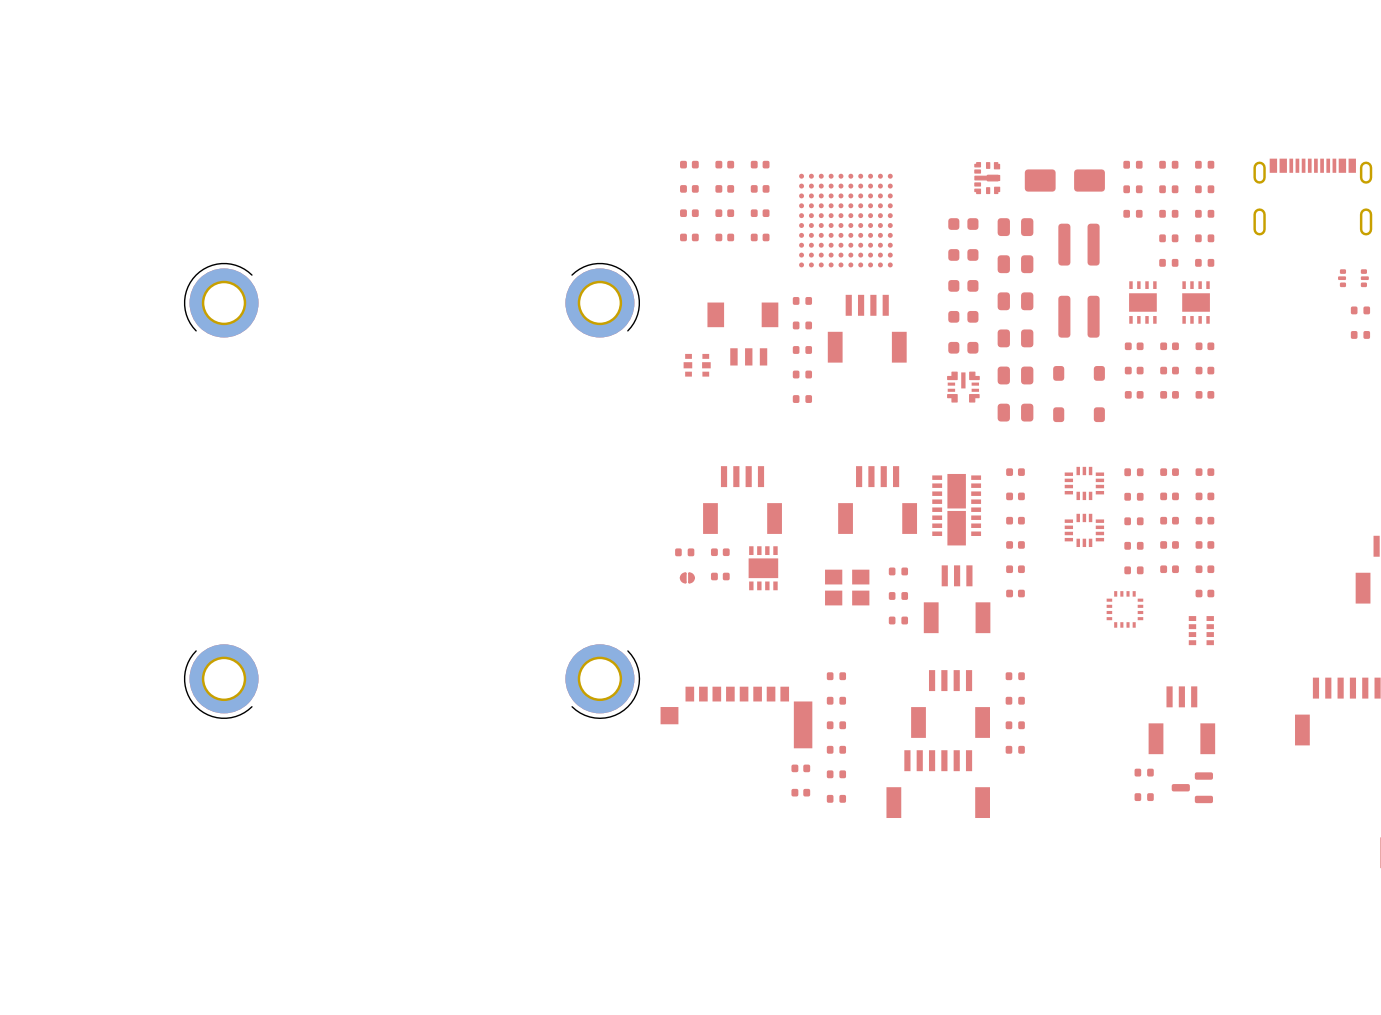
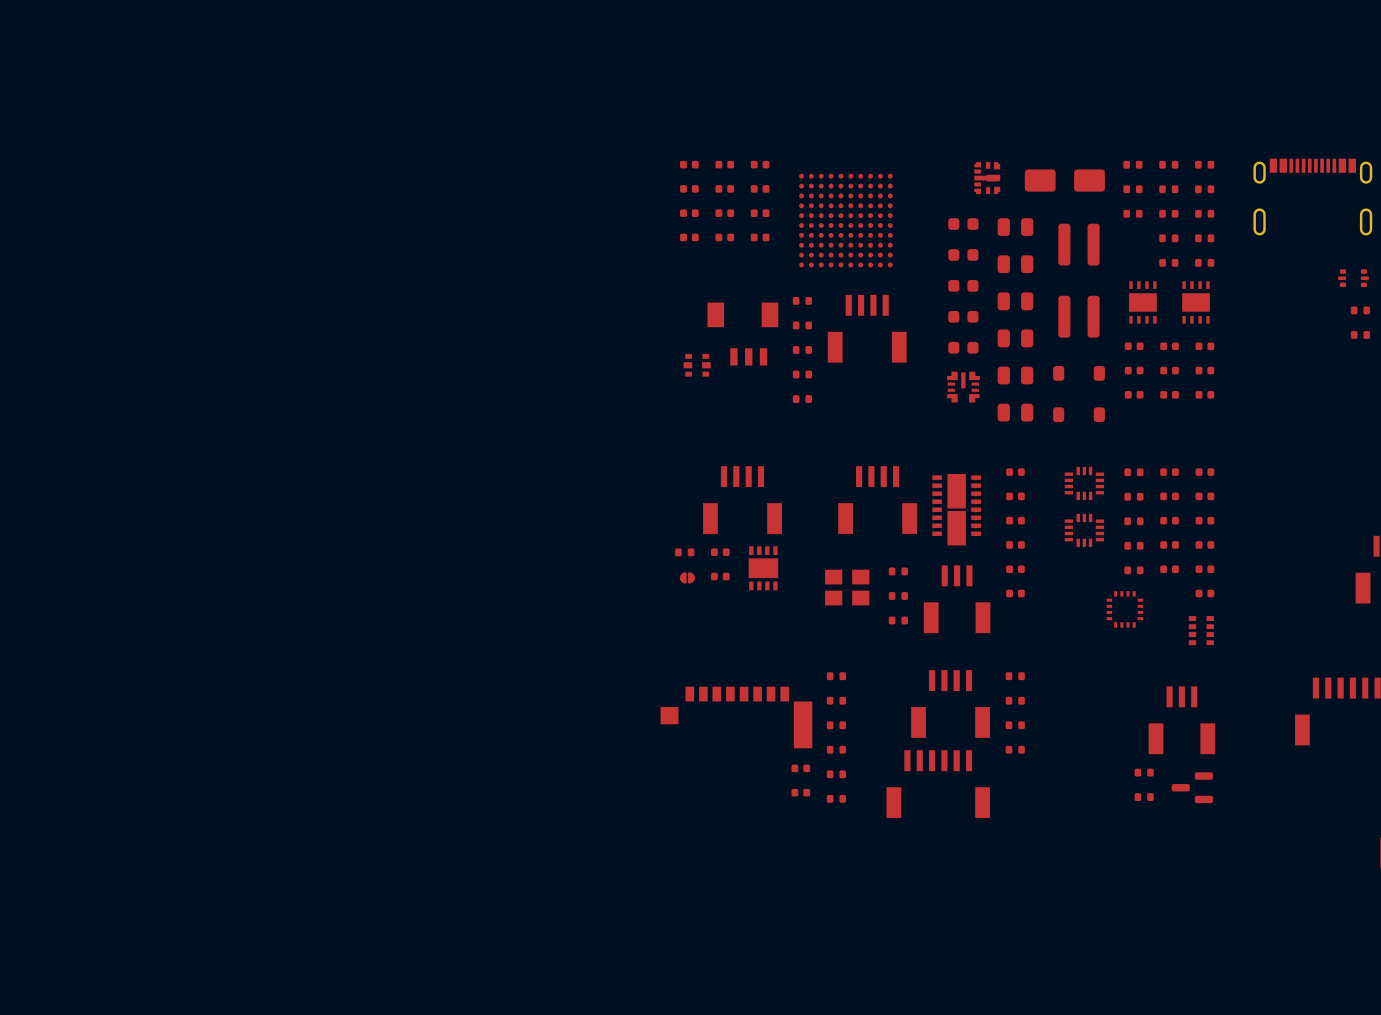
board edge: (251, 275) (240, 266) (226, 263) (207, 266) (196, 275) (188, 286) (184, 305) (188, 319) (196, 330) -> none
board edge: (572, 275) (588, 265) (602, 263) (616, 266) (627, 275) (635, 286) (639, 300) (637, 314) (627, 330) -> none
part: (224, 302) -> none
part: (599, 302) -> none
board edge: (196, 650) (186, 667) (184, 681) (188, 695) (196, 706) (207, 714) (221, 718) (235, 716) (251, 706) -> none
board edge: (627, 650) (636, 663) (639, 678) (636, 693) (627, 706) (615, 715) (600, 718) (584, 715) (572, 706) -> none
part: (224, 678) -> none
part: (599, 678) -> none

